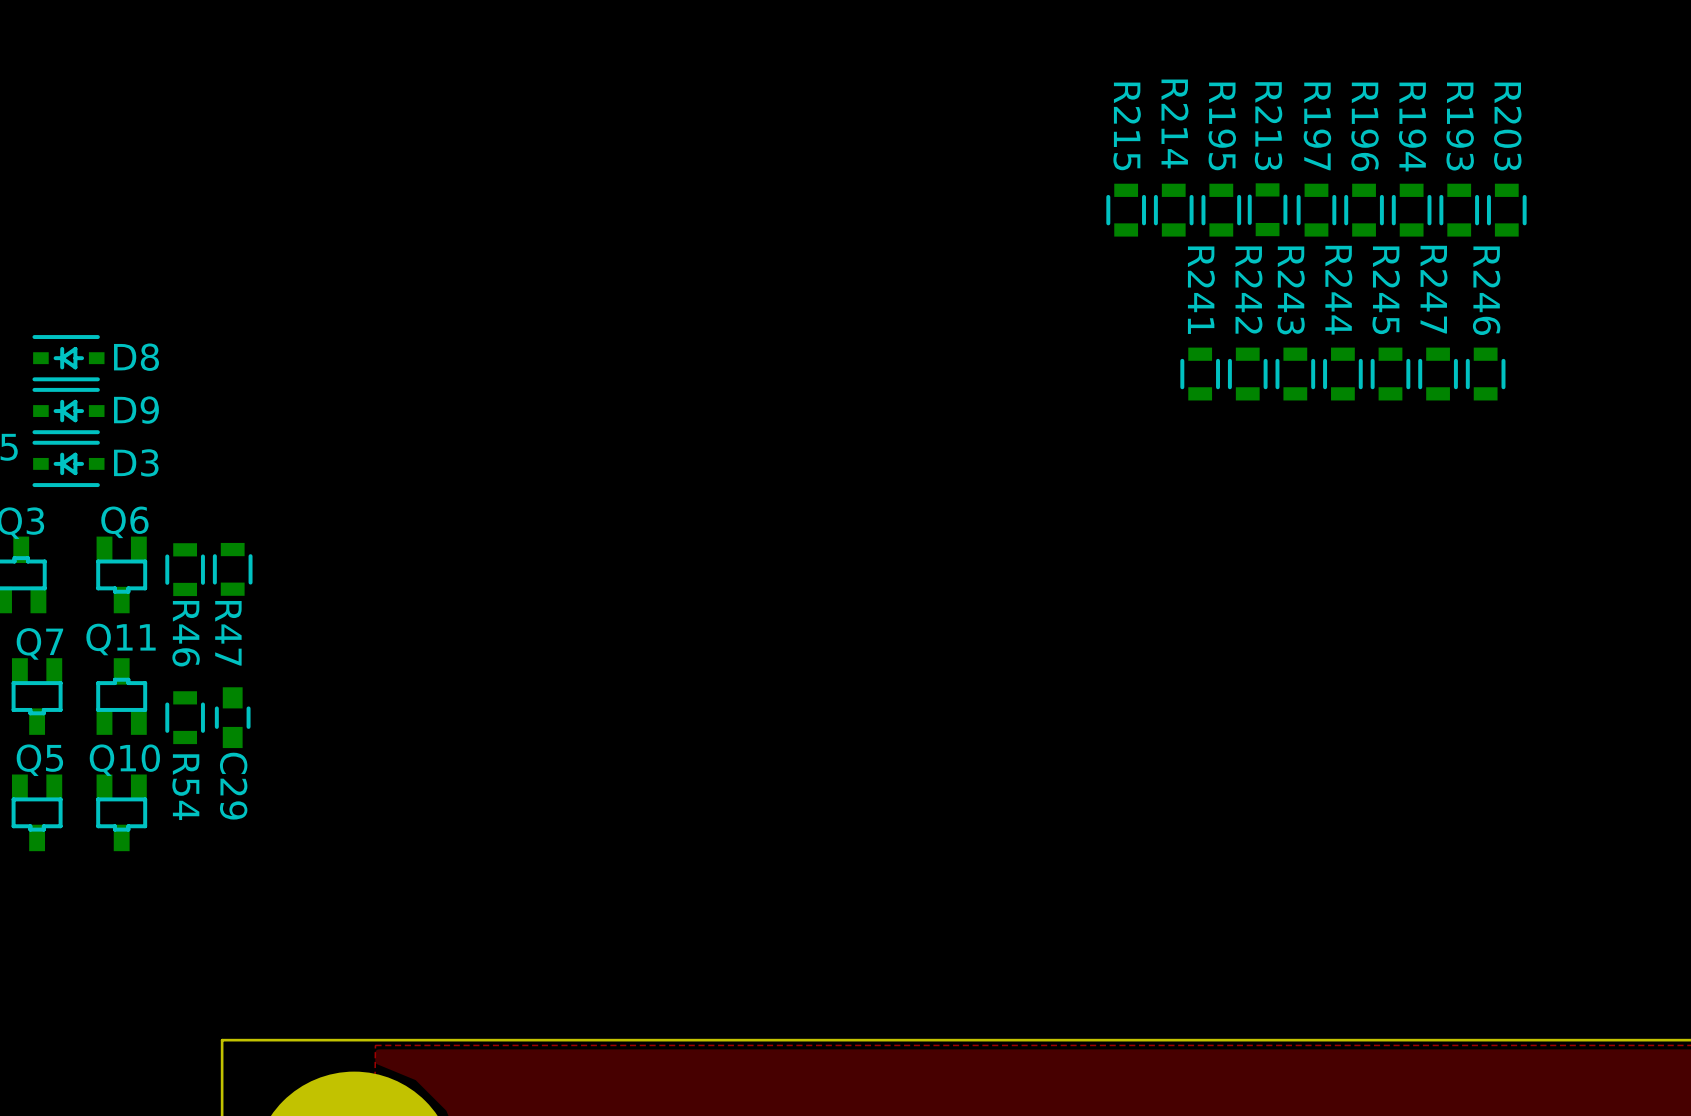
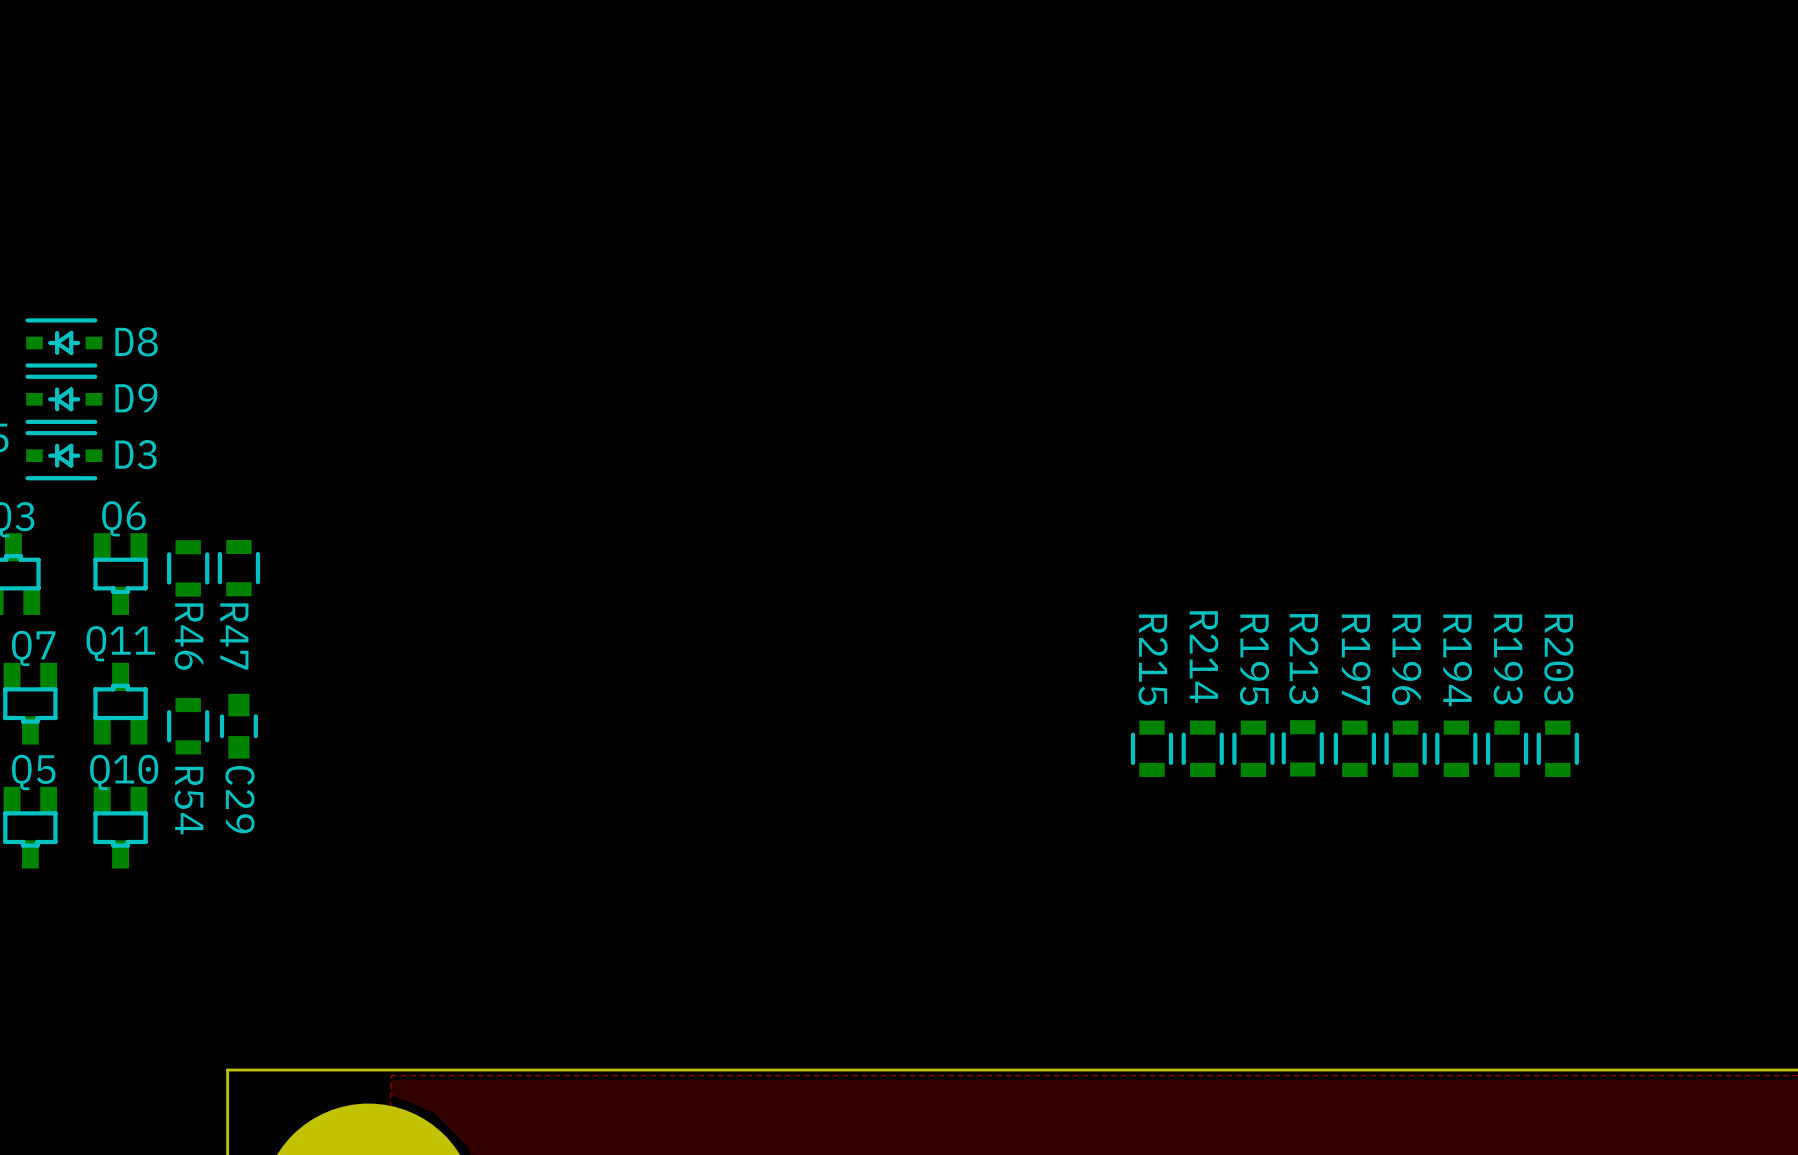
R213 position: (1267, 209) -> (1302, 748)
R215 position: (1126, 210) -> (1151, 748)
R214 position: (1173, 210) -> (1202, 748)
R195 position: (1221, 210) -> (1253, 748)
R197 position: (1316, 210) -> (1354, 748)
R196 position: (1364, 210) -> (1405, 748)
R194 position: (1411, 210) -> (1456, 748)
R193 position: (1459, 210) -> (1507, 748)
R203 position: (1506, 210) -> (1557, 748)
R241: (1200, 374) -> none
R242: (1247, 374) -> none
R243: (1295, 374) -> none
R244: (1342, 374) -> none
R245: (1390, 374) -> none
R247: (1438, 374) -> none
R246: (1485, 374) -> none

